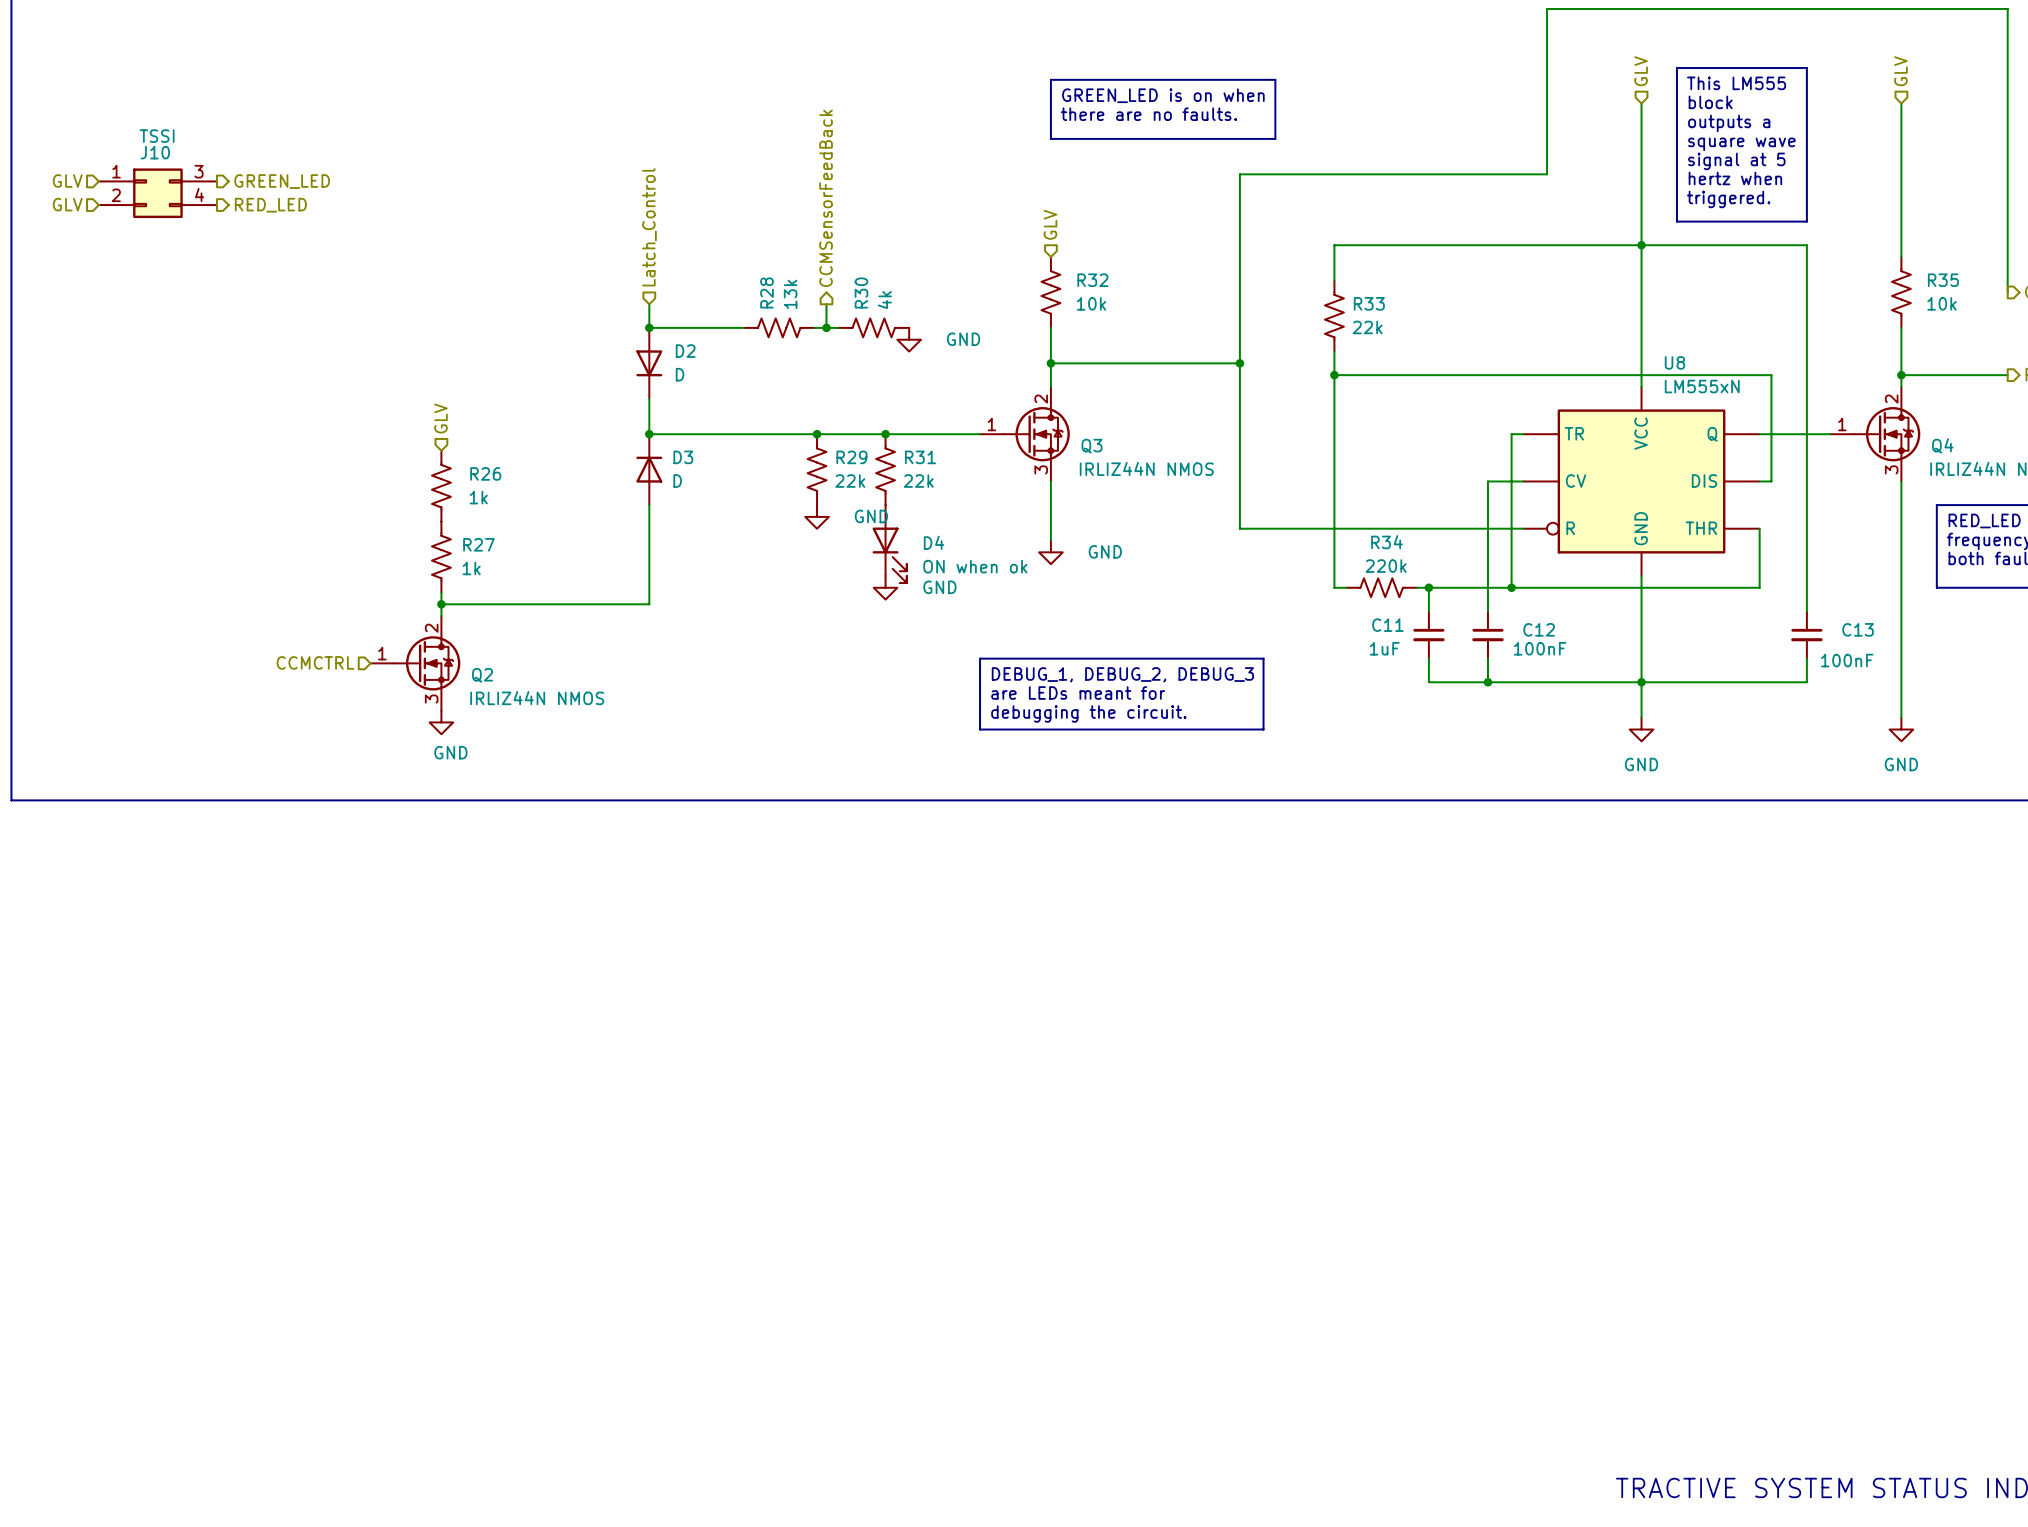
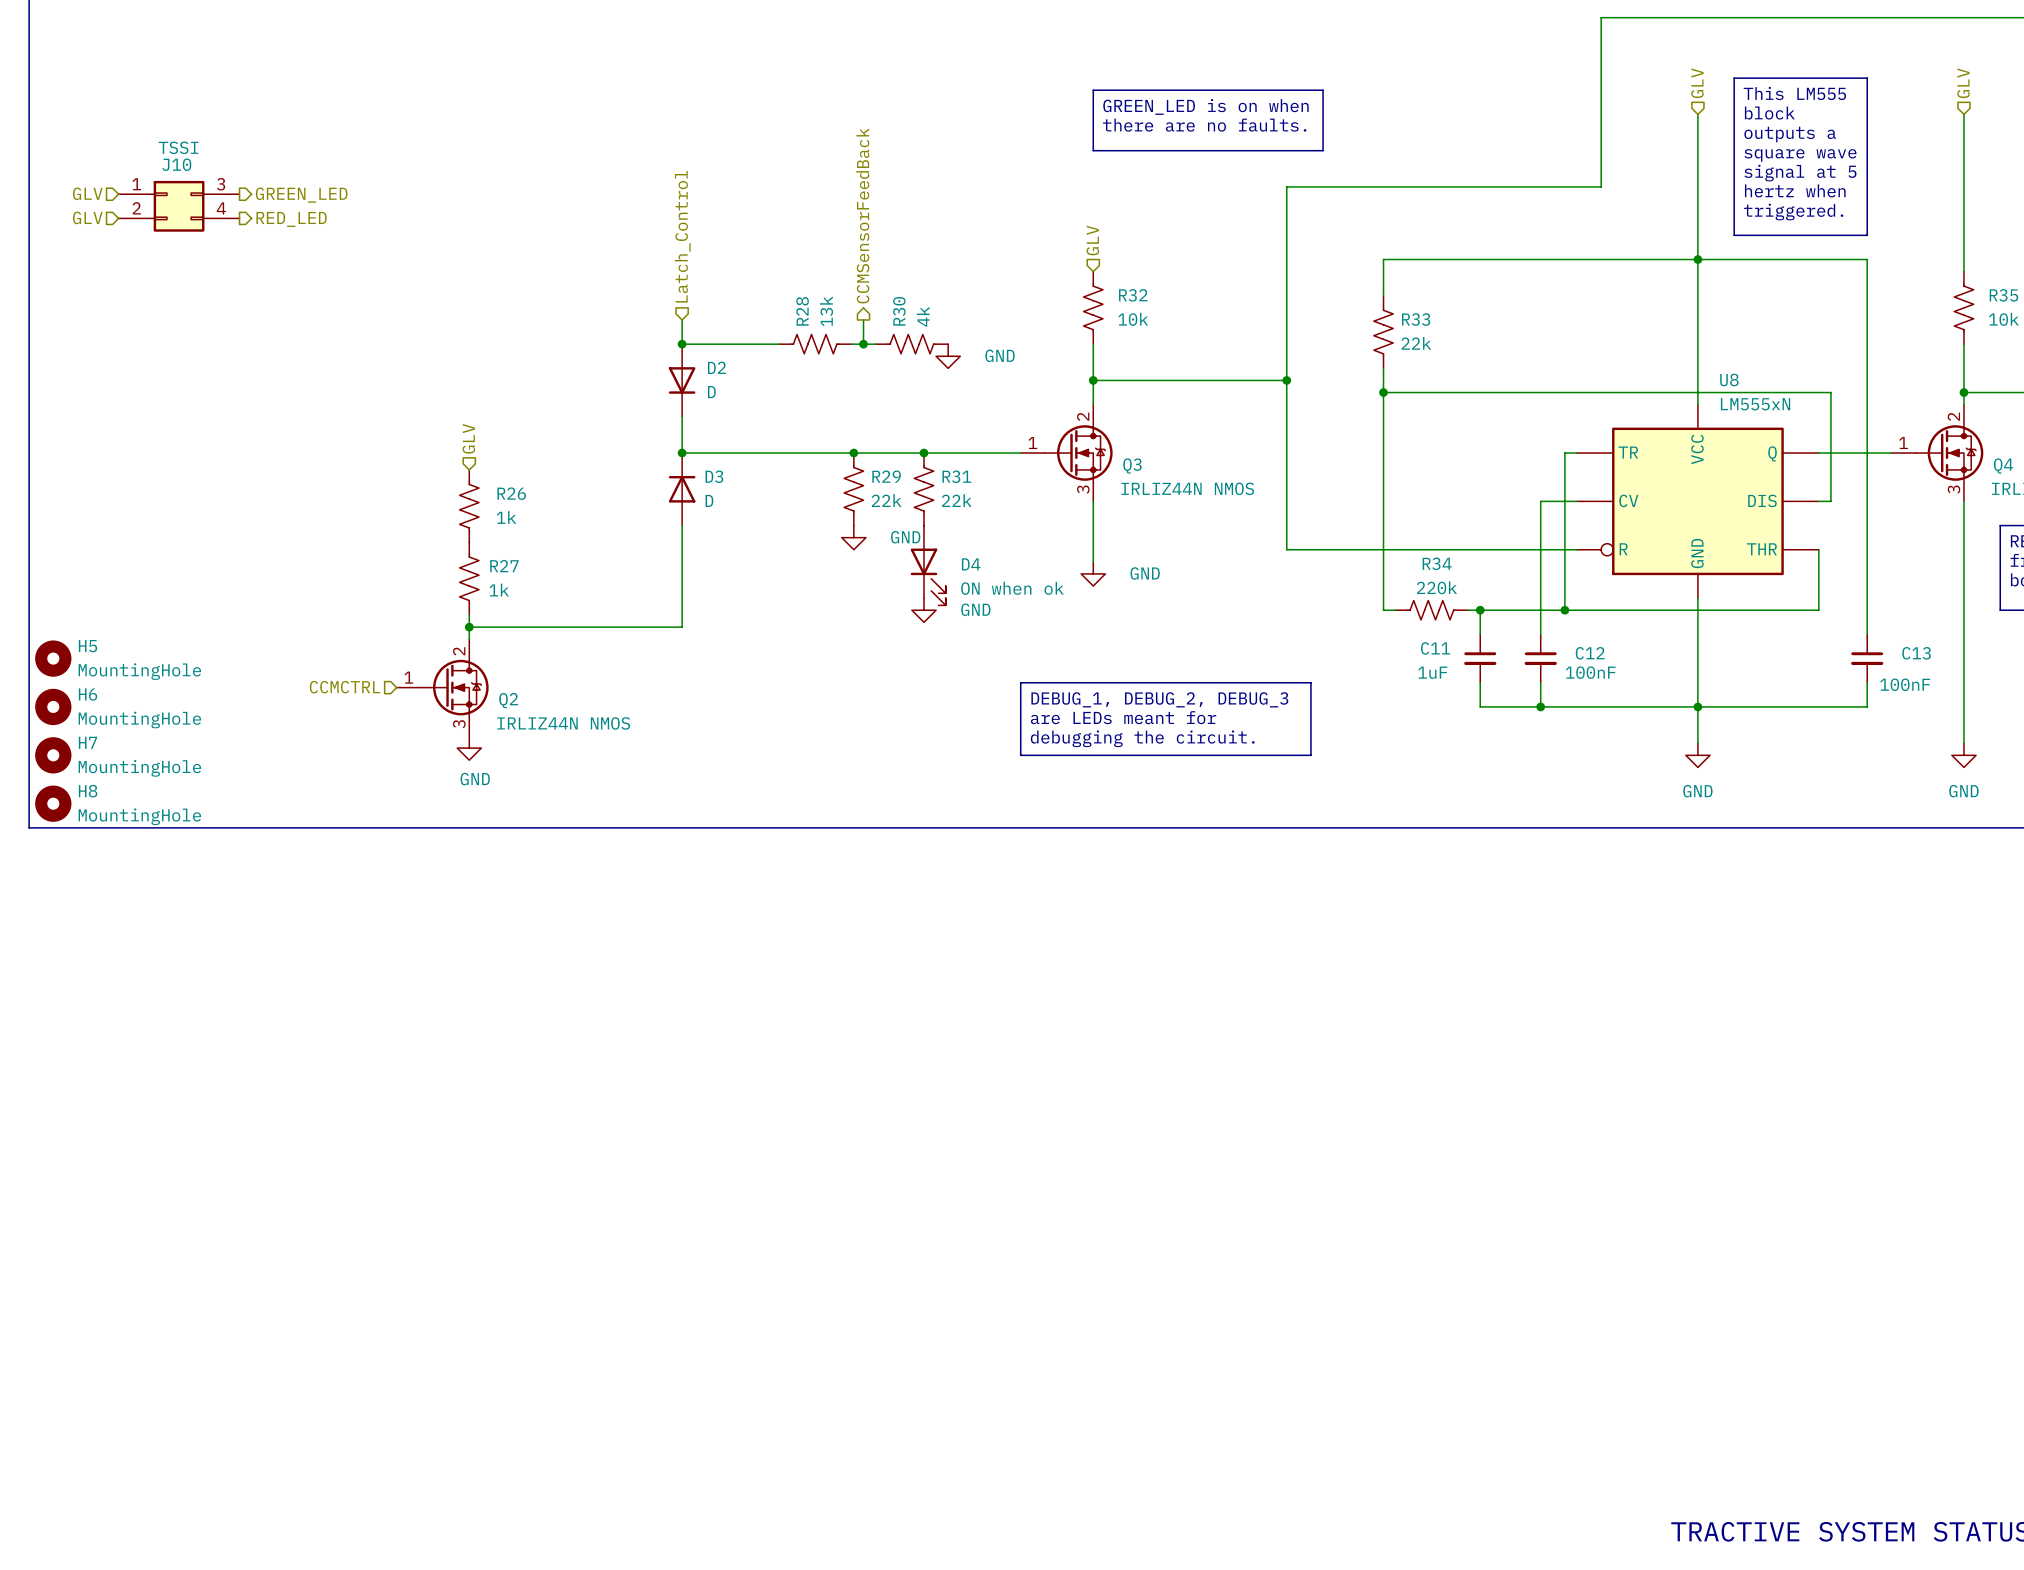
H5: none -> MountingHole (53, 658)
H6: none -> MountingHole (53, 706)
H7: none -> MountingHole (53, 755)
H8: none -> MountingHole (53, 803)

